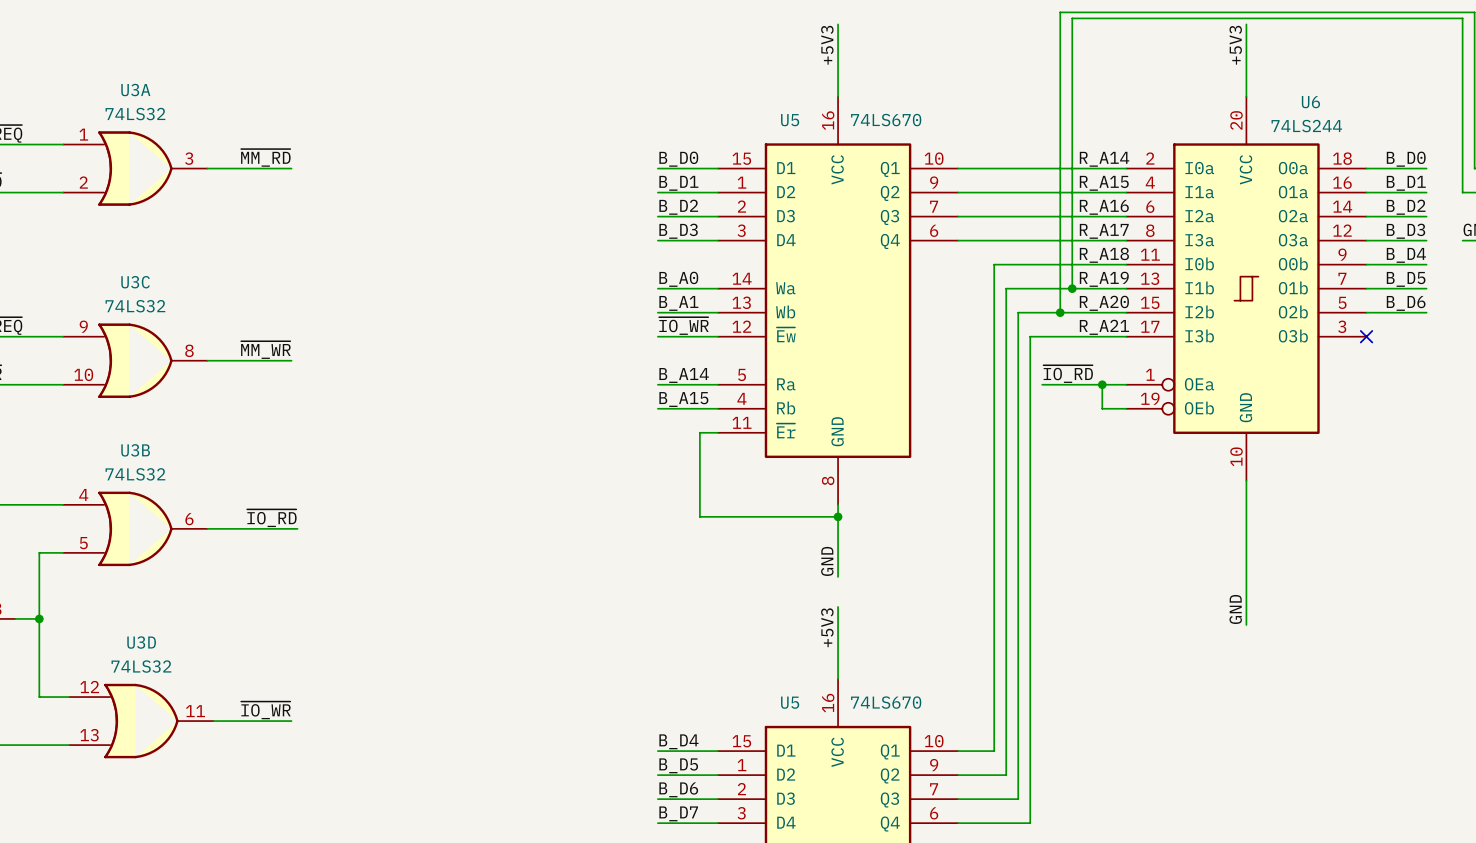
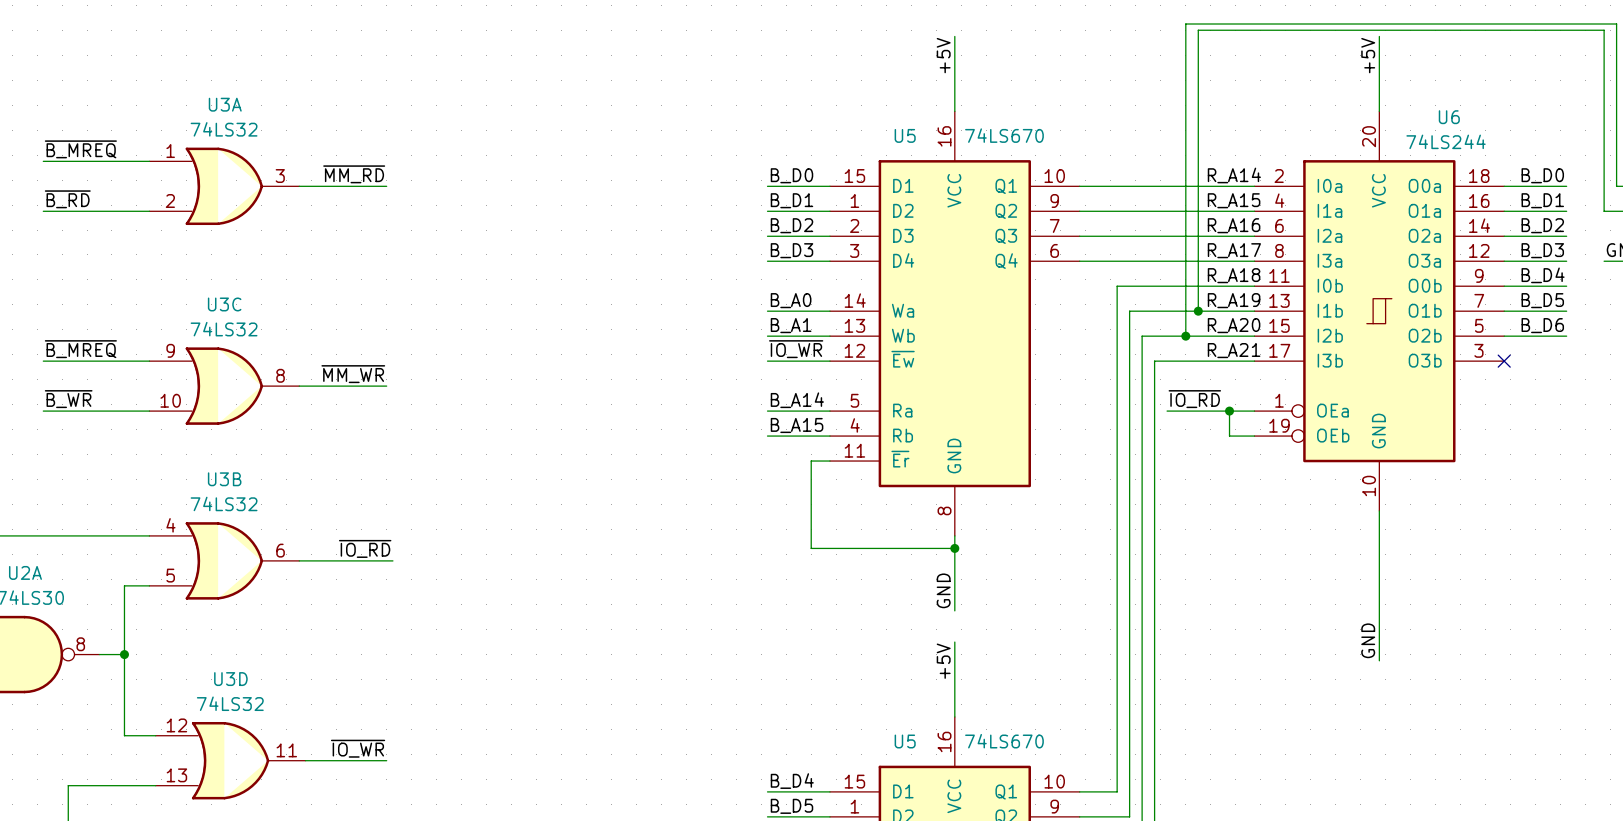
label: +5V3 (827, 45) -> +5V (943, 55)
label: +5V3 (1235, 45) -> +5V (1368, 55)
label: +5V3 (827, 627) -> +5V (943, 661)

